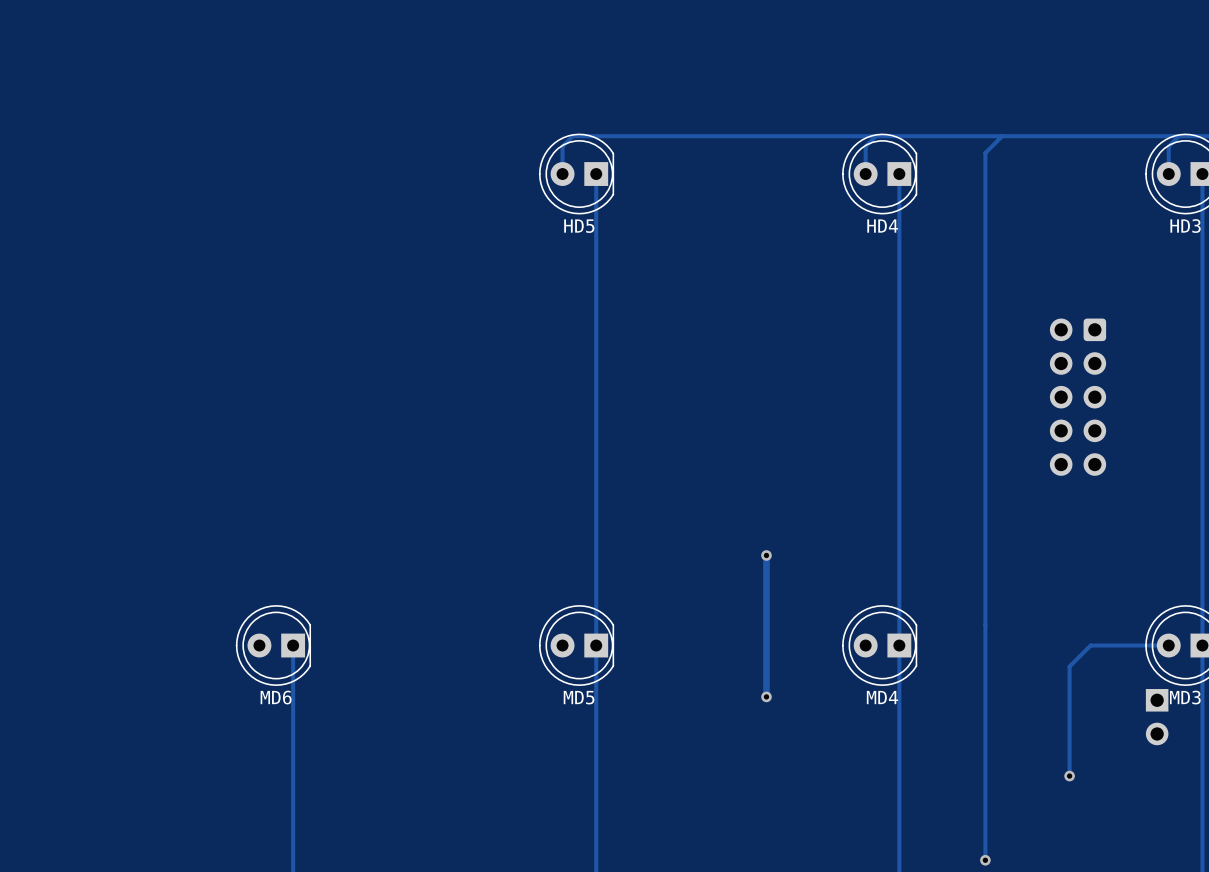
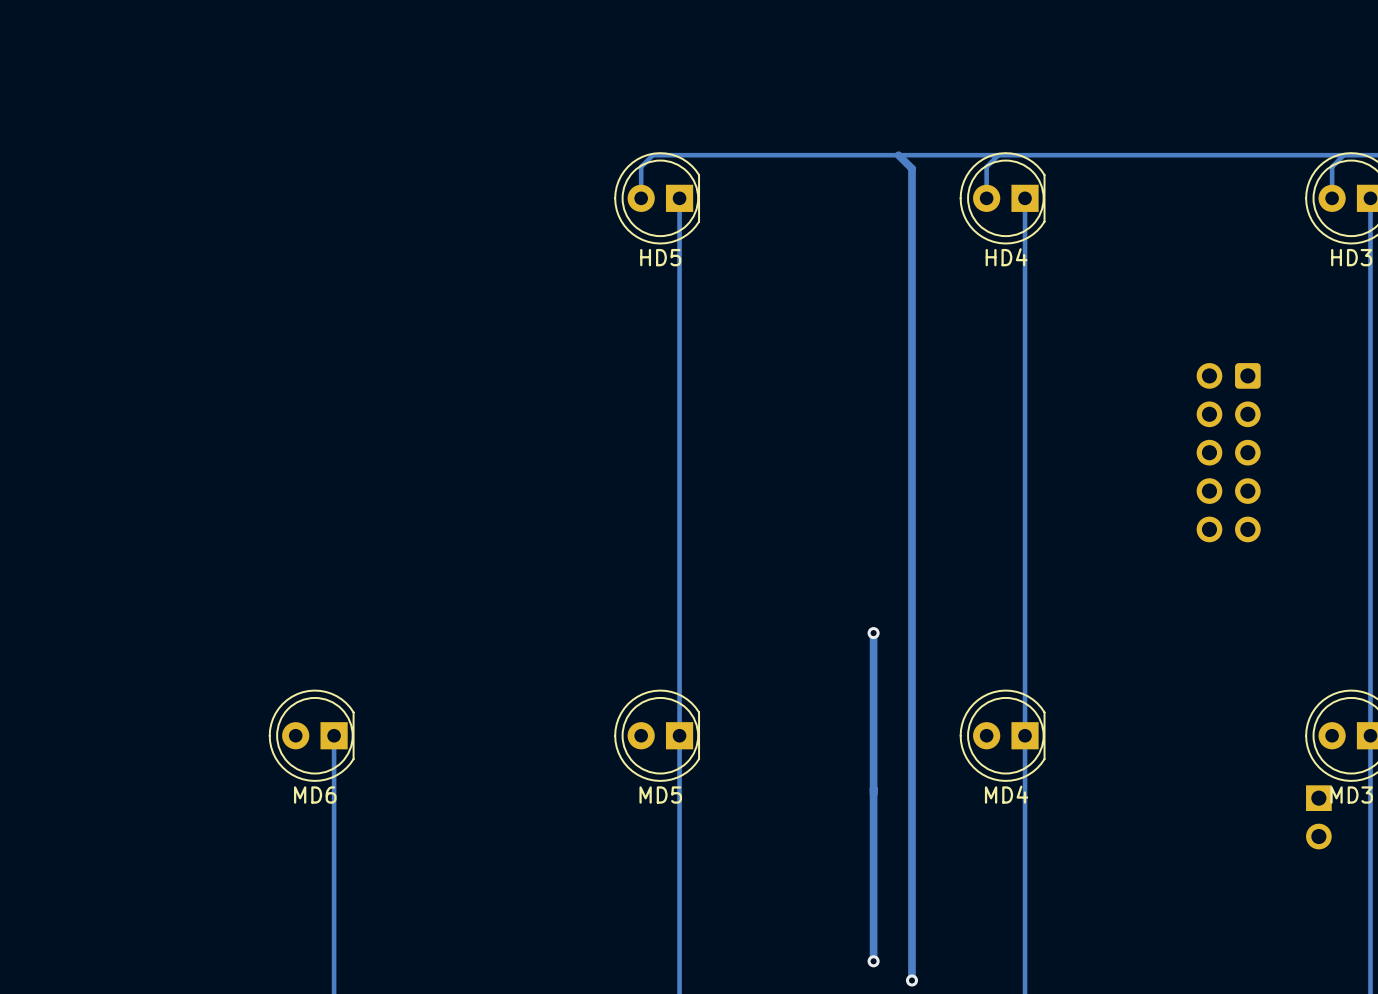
track: none -> (898, 155) (911, 168) (911, 980)
track: (1002, 136) (985, 153) (985, 860) -> none
track: (1168, 645) (1090, 645) (1069, 666) (1069, 776) -> none
track: none -> (873, 794) (873, 961)
via: (766, 696) -> none
via: (1069, 776) -> none
via: none -> (873, 961)
via: none -> (911, 980)
via: (985, 860) -> none

